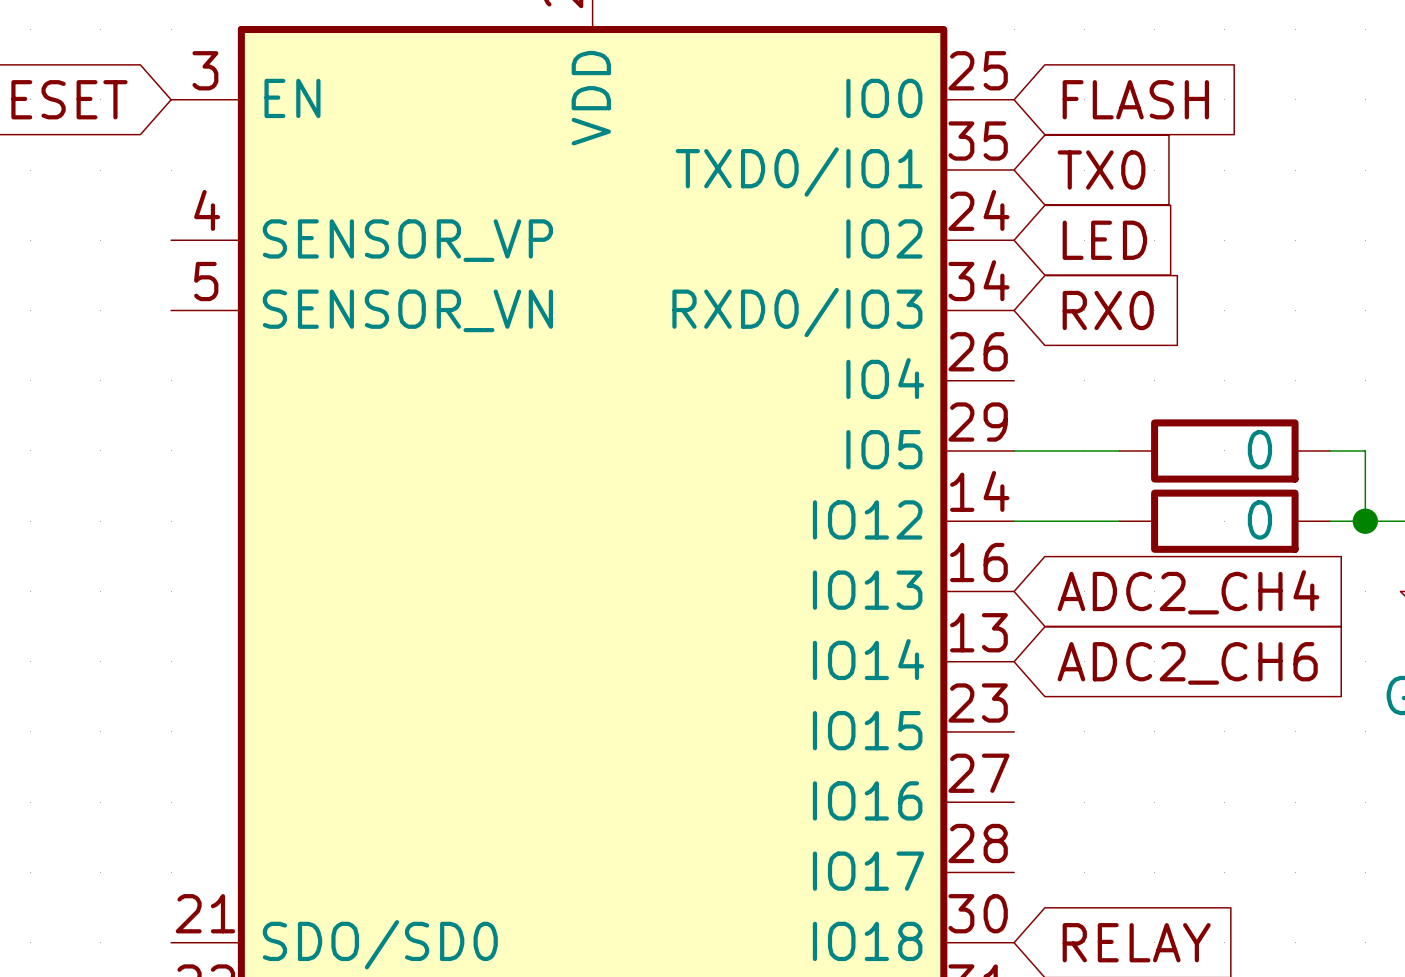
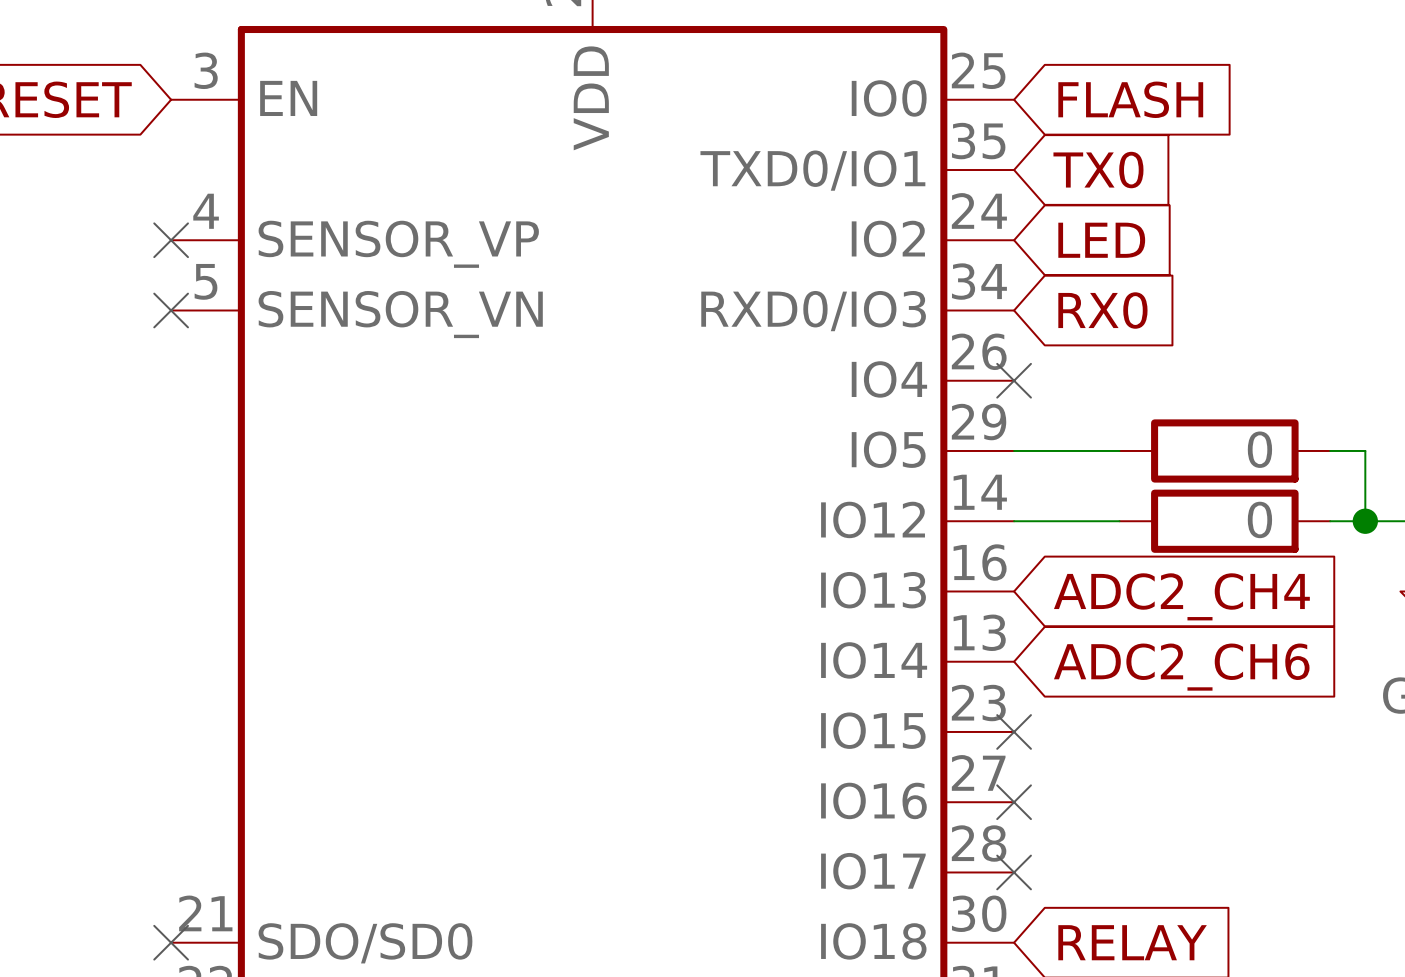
no-connect mark: none -> (171, 240)
no-connect mark: none -> (171, 310)
no-connect mark: none -> (1014, 380)
no-connect mark: none -> (1014, 731)
no-connect mark: none -> (1014, 802)
no-connect mark: none -> (1014, 872)
no-connect mark: none -> (171, 942)

